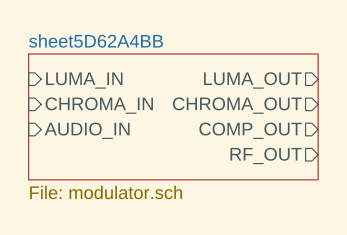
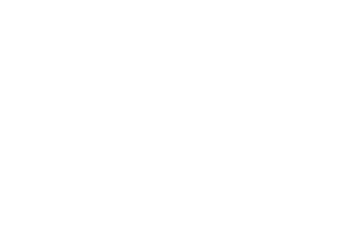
sheet pin: LUMA_IN (84, 80) -> none
sheet pin: LUMA_OUT (252, 80) -> none
sheet pin: CHROMA_IN (99, 105) -> none
sheet pin: CHROMA_OUT (237, 105) -> none
sheet sheet5D62A4BB: File: modulator.sch (173, 116) -> none
sheet pin: AUDIO_IN (87, 130) -> none
sheet pin: COMP_OUT (250, 130) -> none
sheet pin: RF_OUT (266, 155) -> none

